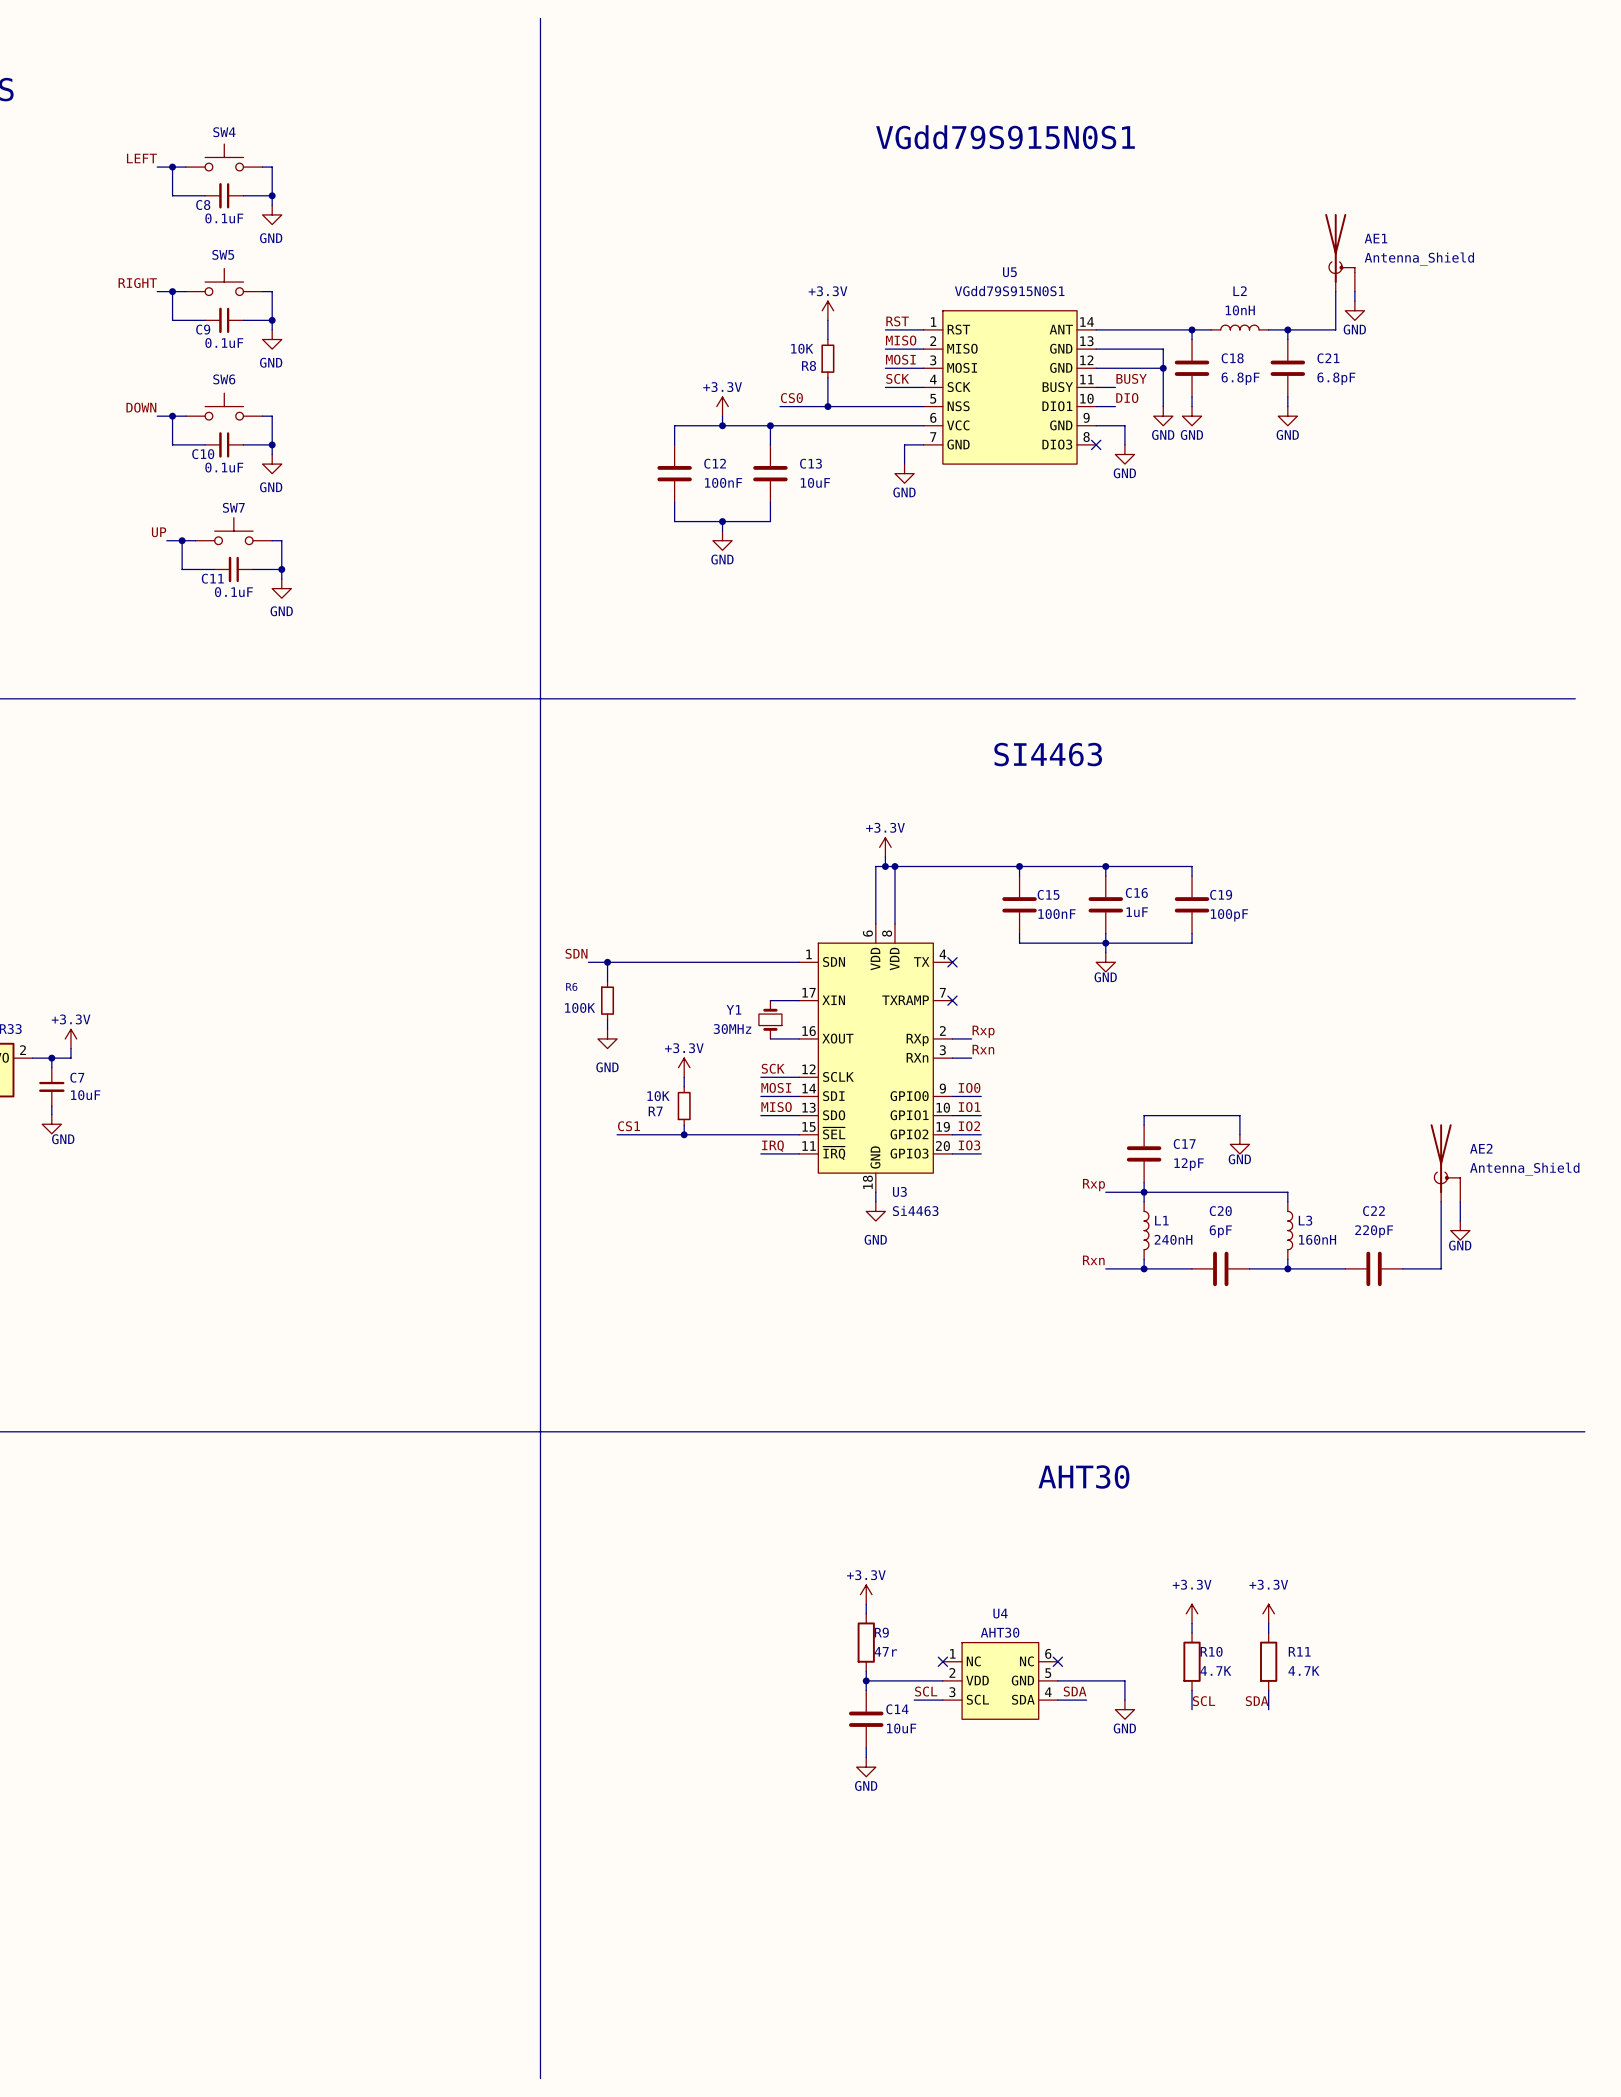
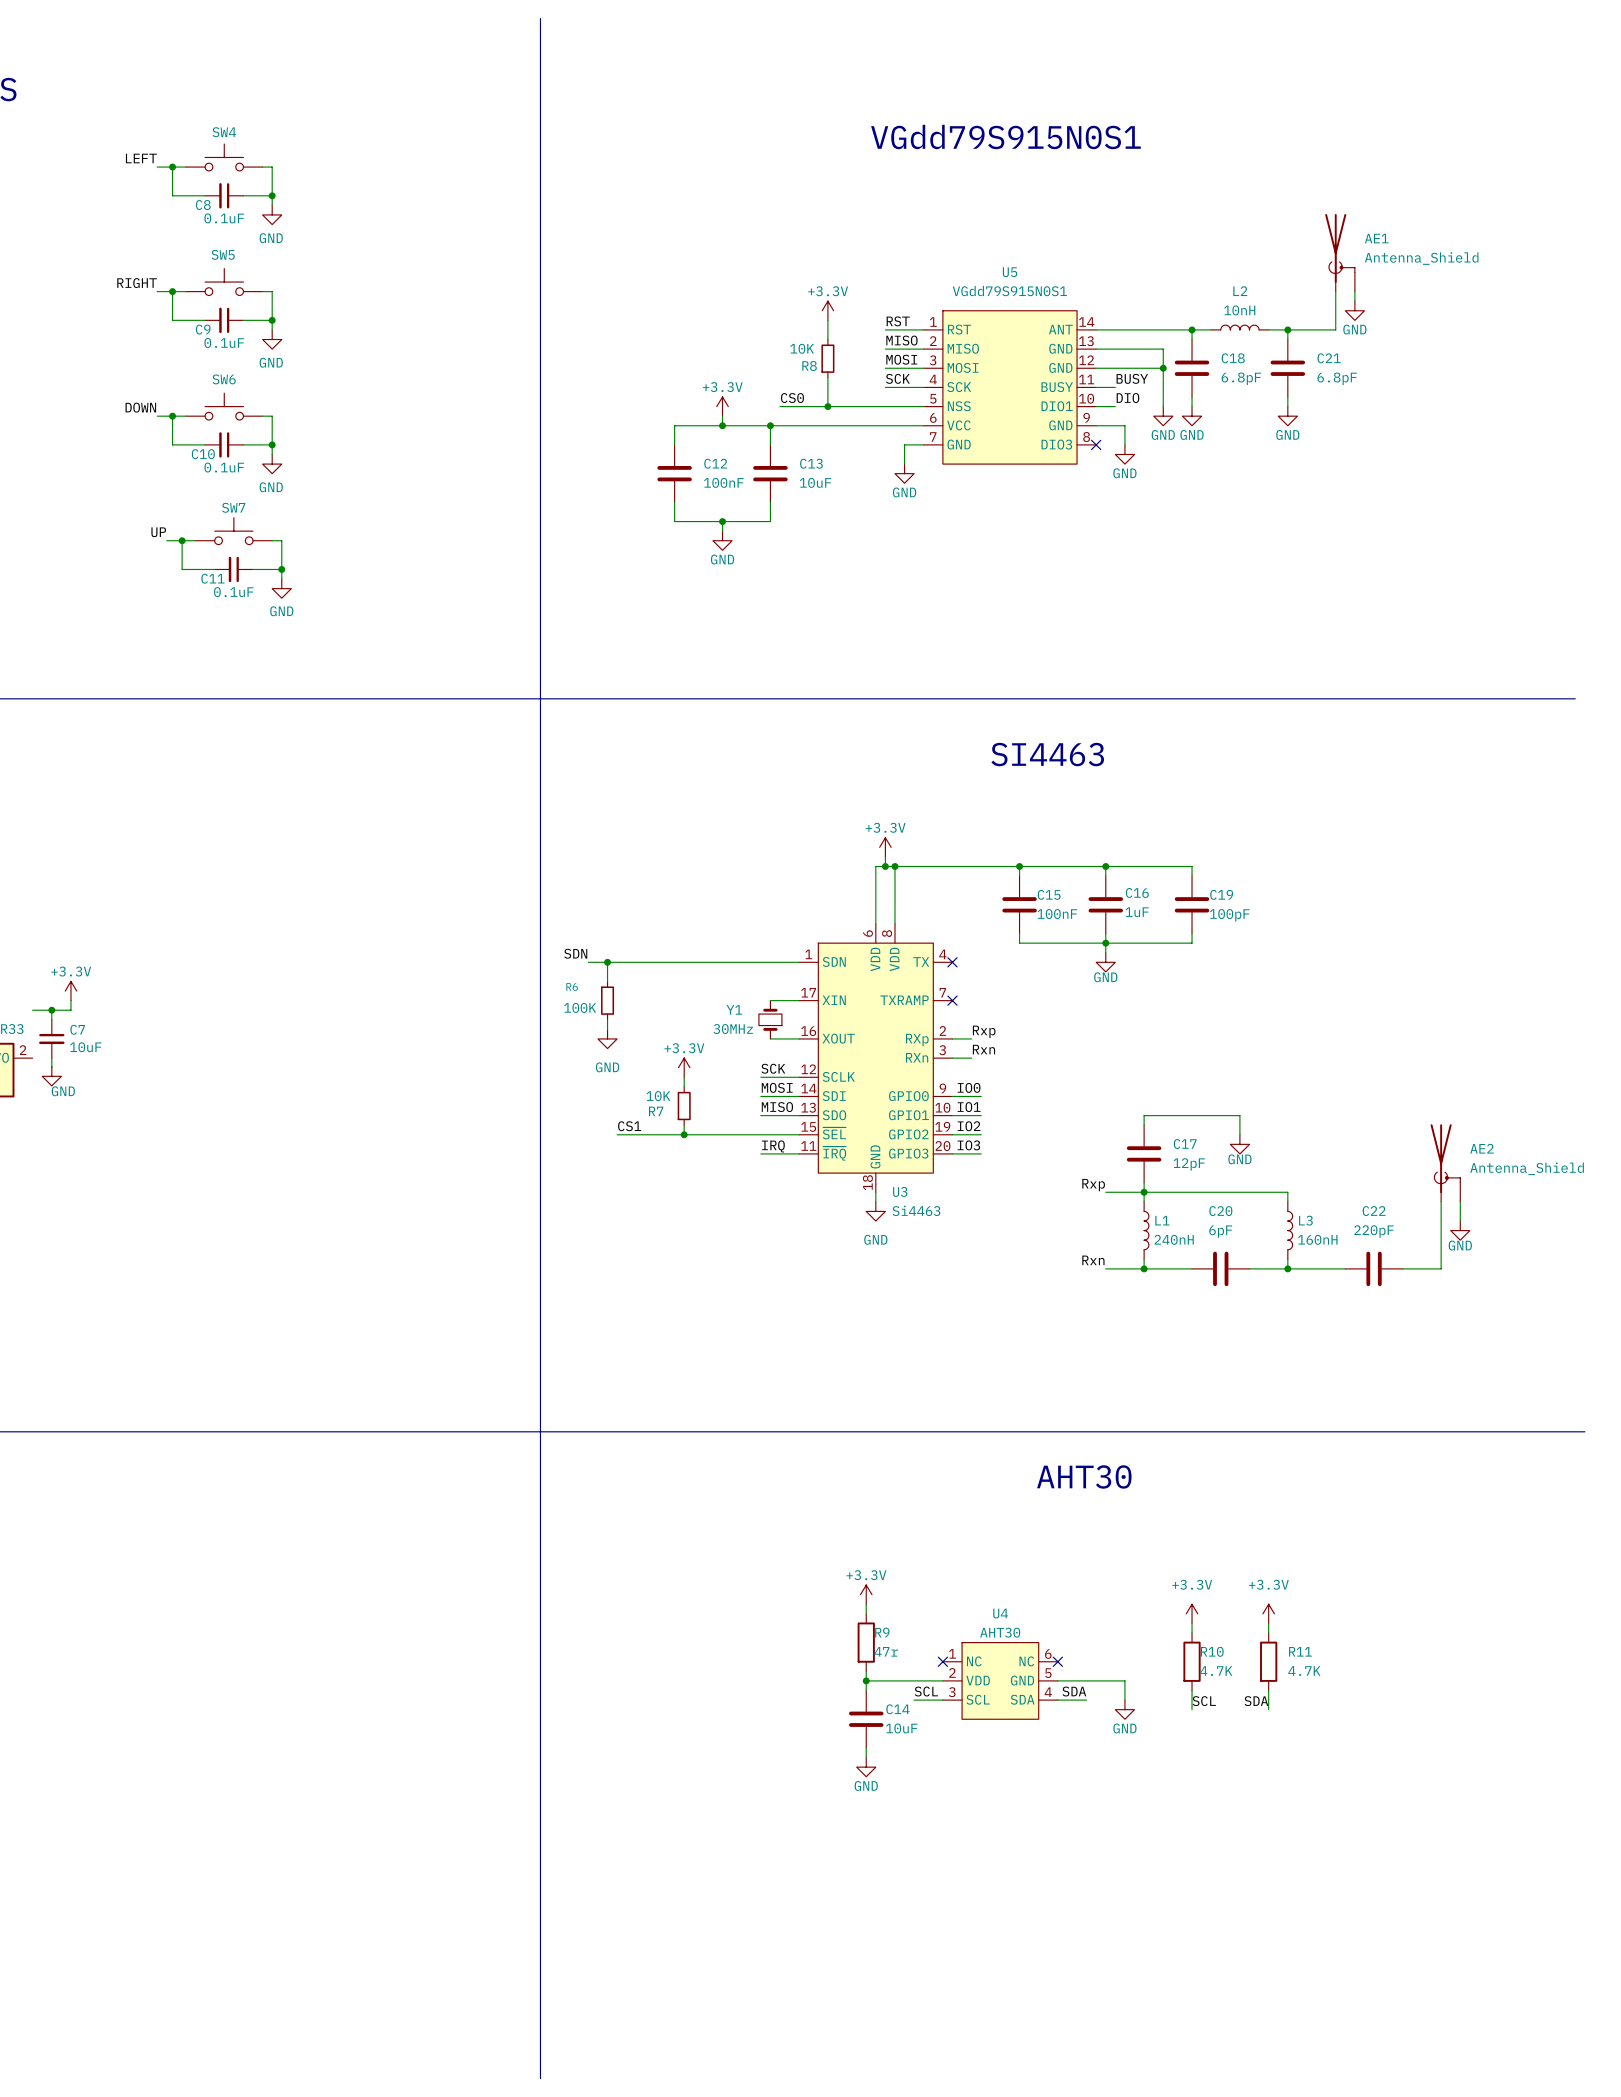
wire: none -> (51, 1010) (51, 1019)
junction: none -> (51, 1010)
power symbol position: +3.3V (70, 1038) -> +3.3V (70, 991)
wire: (70, 1048) (70, 1058) (32, 1058) -> (70, 1000) (70, 1010) (32, 1010)
junction: (51, 1058) -> none
power symbol: none -> GND (51, 1076)
C7 position: (51, 1086) -> (51, 1038)
wire: (51, 1106) (51, 1114) -> none
power symbol: GND (51, 1124) -> none

